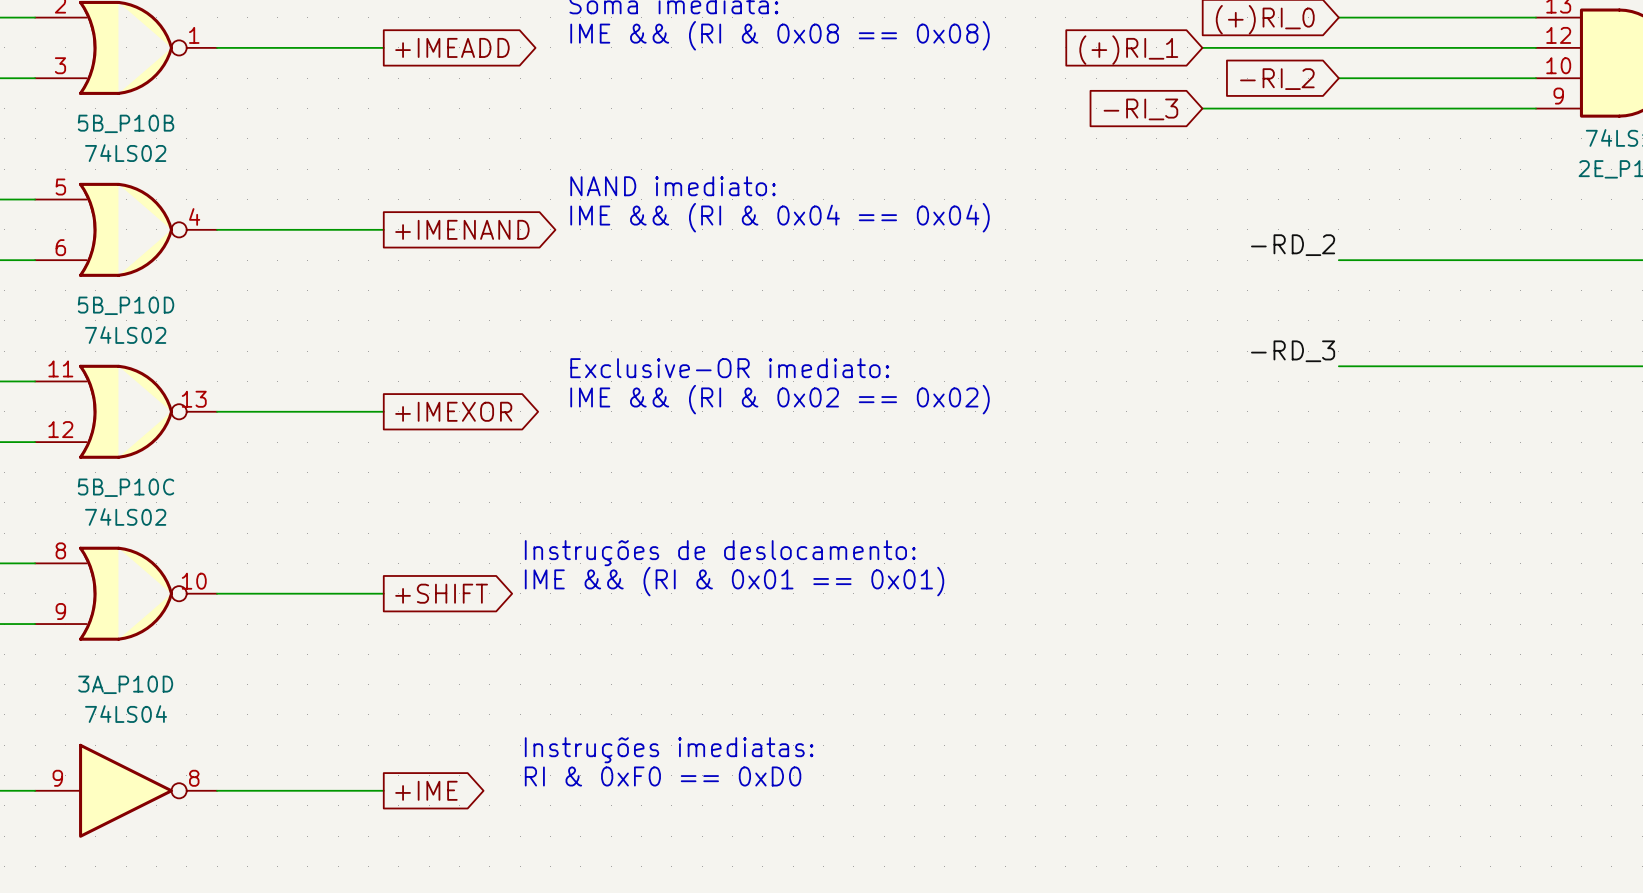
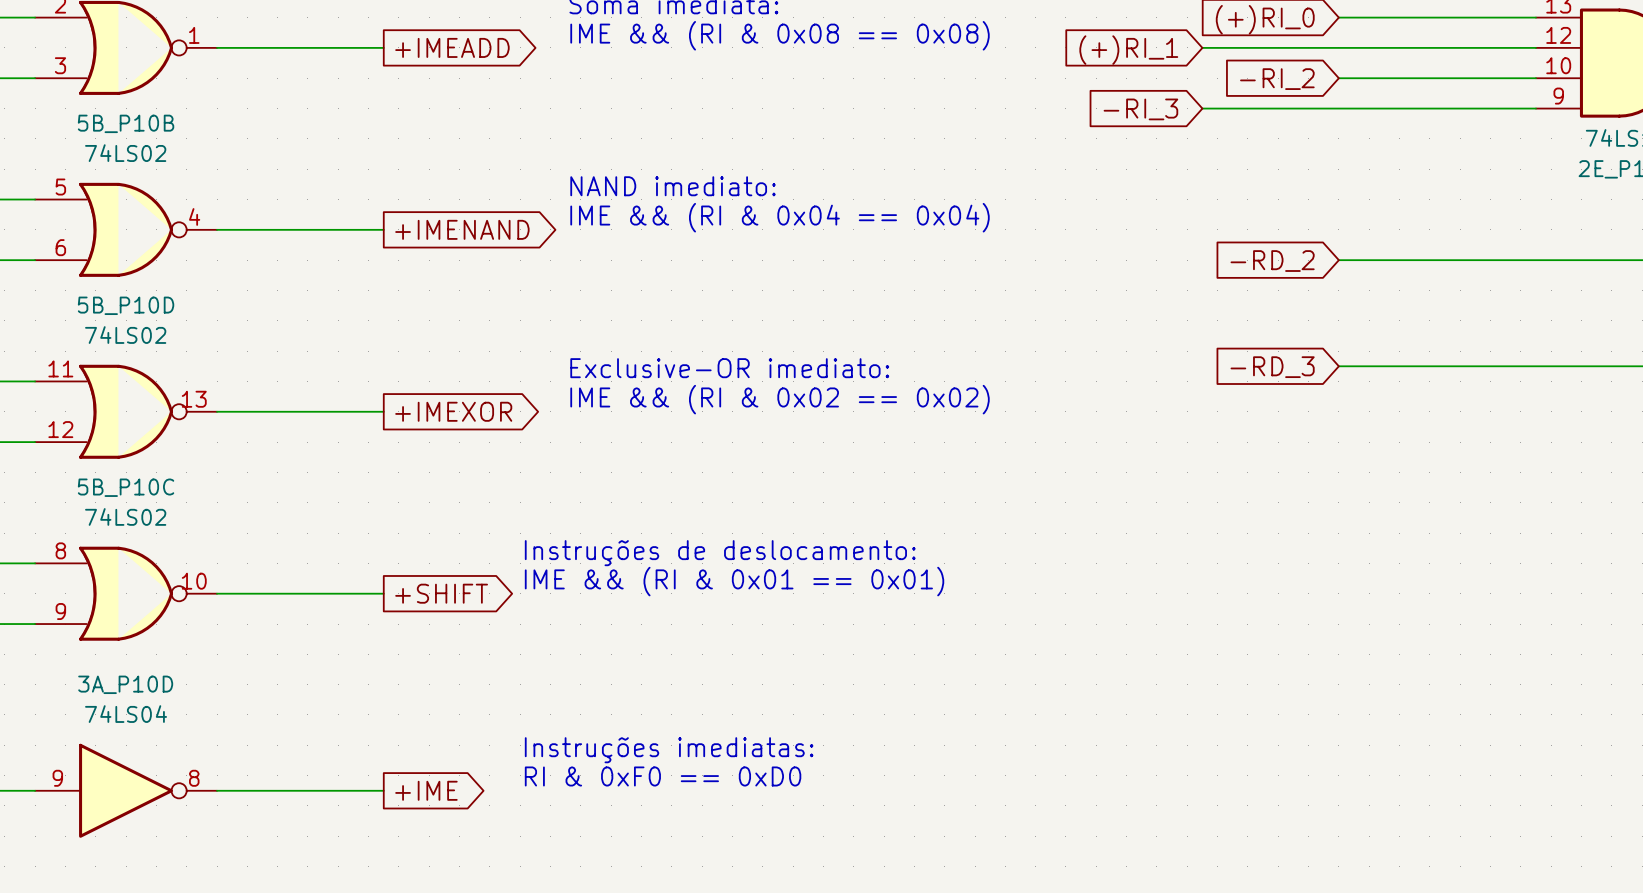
label: -RD_2 (1293, 245) -> none
global label: none -> -RD_2 (1272, 261)
label: -RD_3 (1293, 351) -> none
global label: none -> -RD_3 (1272, 367)

